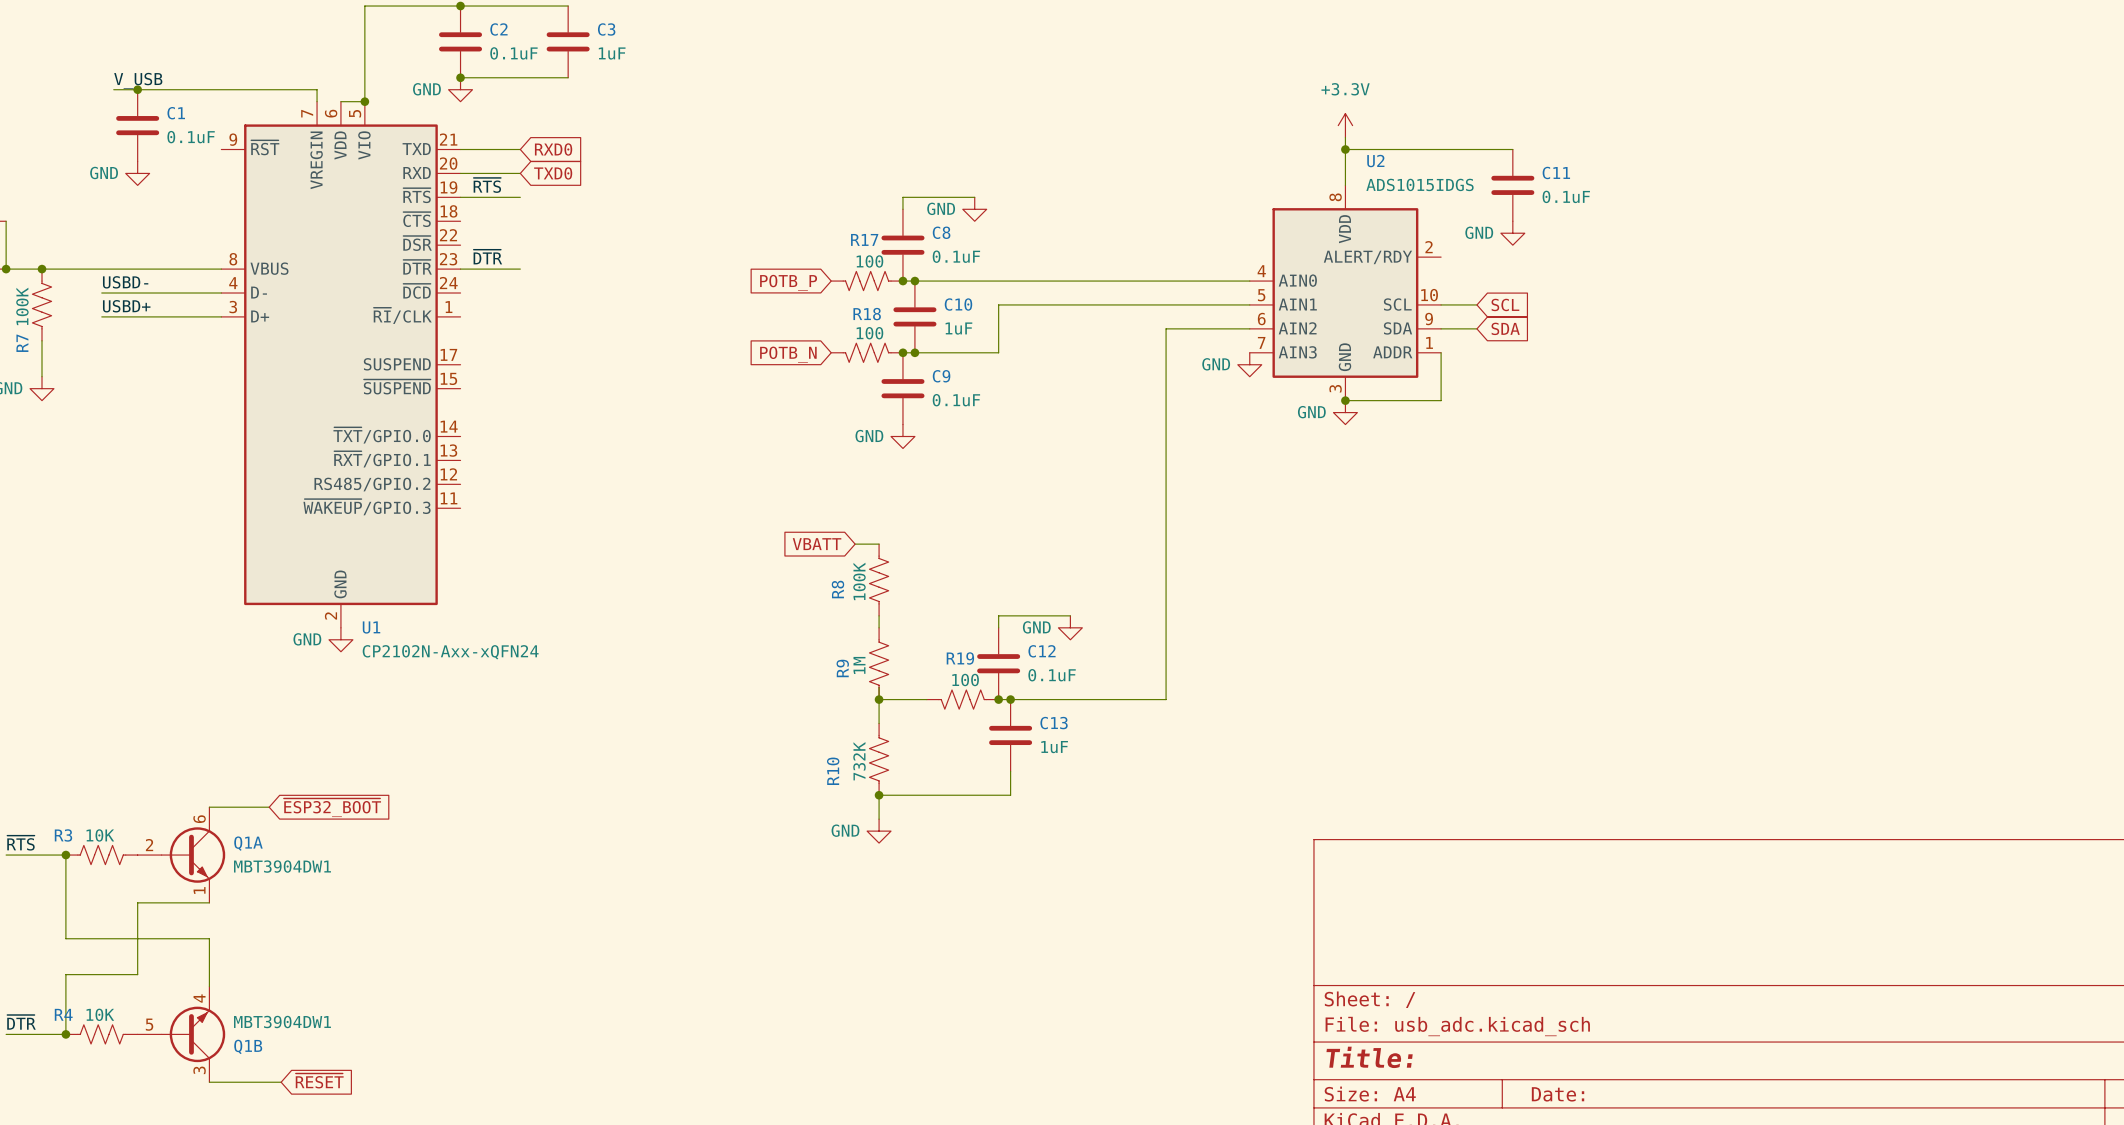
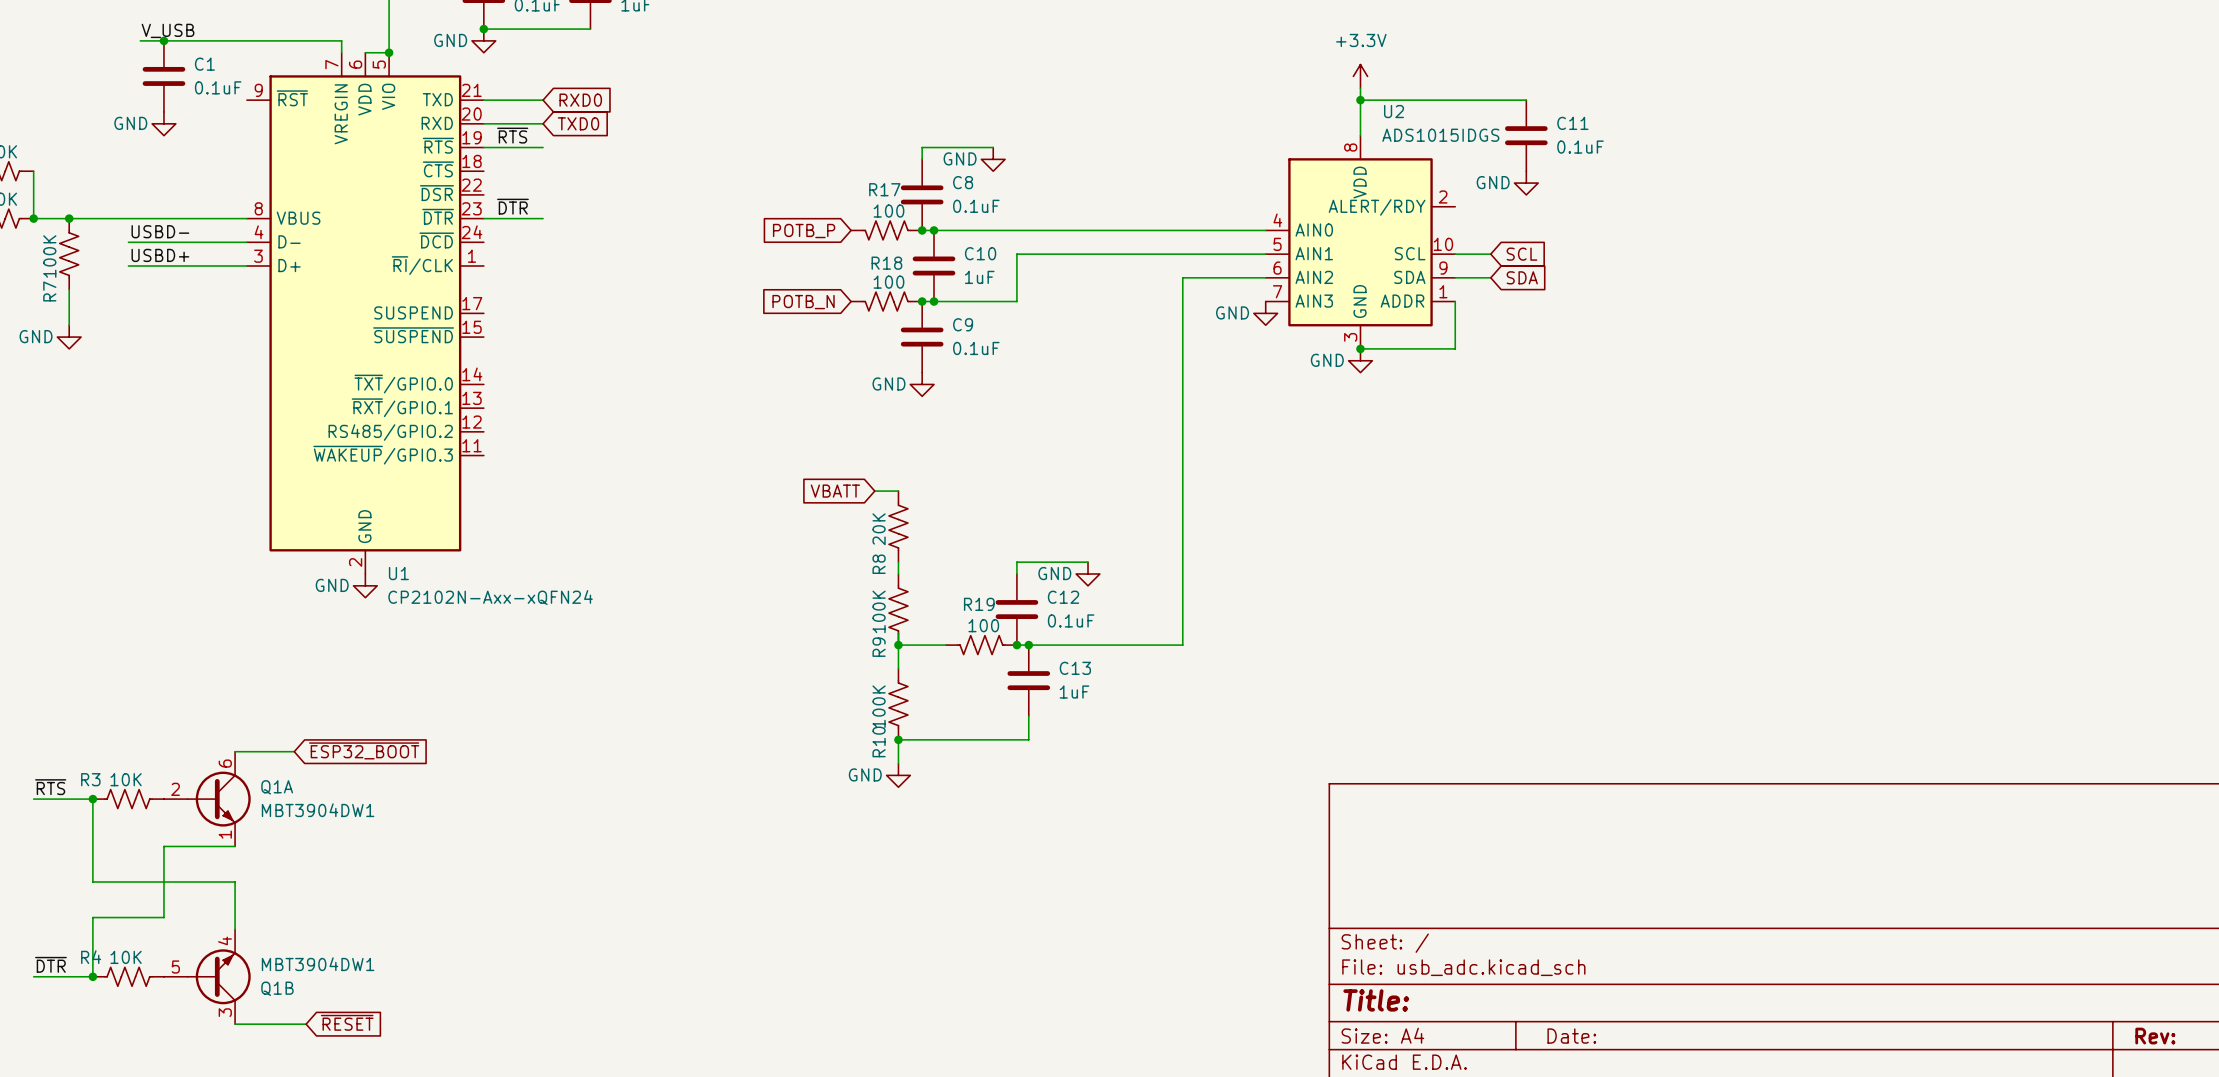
R8 value: 100K (859, 581) -> 20K (879, 529)
R8 name position: R8 (837, 589) -> R8 (879, 564)
R9 value: 1M (859, 665) -> 100K (879, 611)
R9 name position: R9 (842, 668) -> R9 (879, 647)
R10 value: 732K (859, 761) -> 100K (879, 706)
R10 name position: R10 (833, 771) -> R10 (879, 741)

